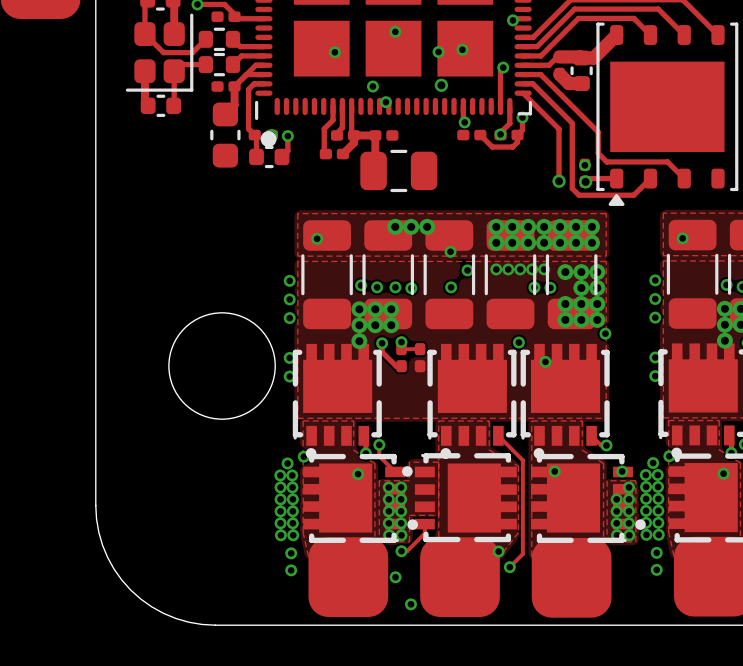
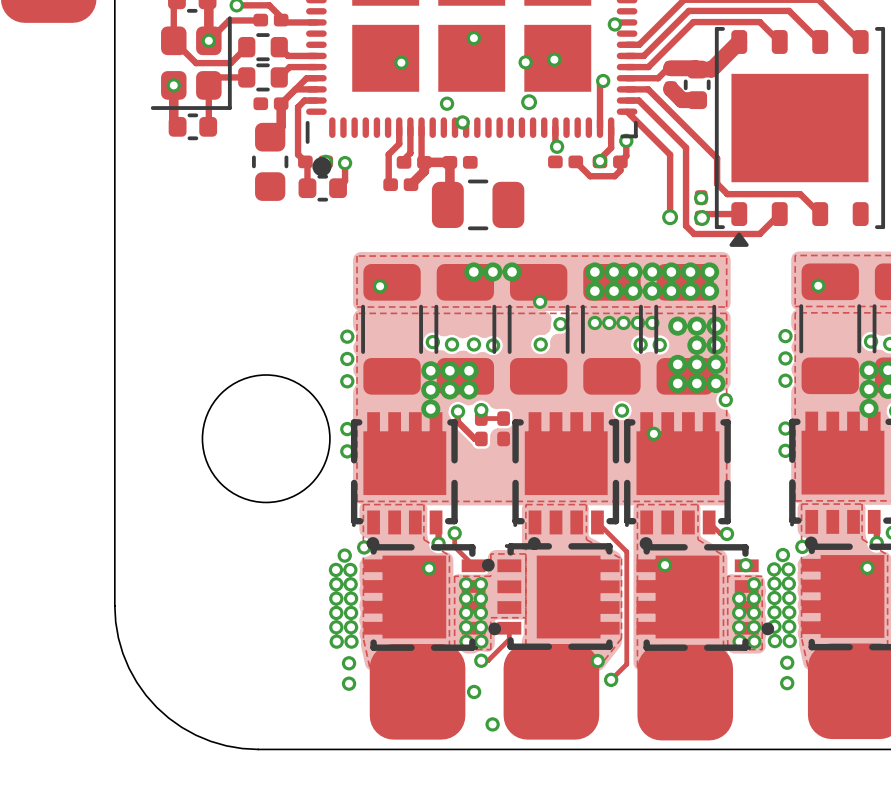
track: none -> (260, 20) (229, 20) (208, 40)
via: none -> (208, 40)
via: none -> (173, 85)

